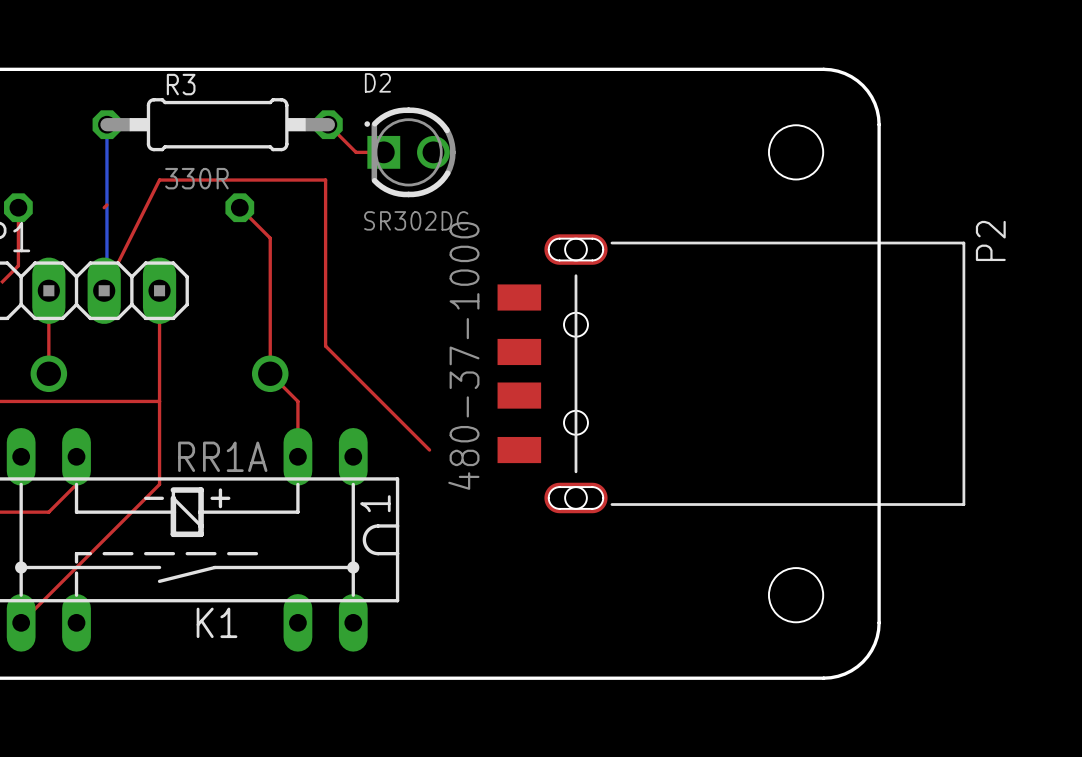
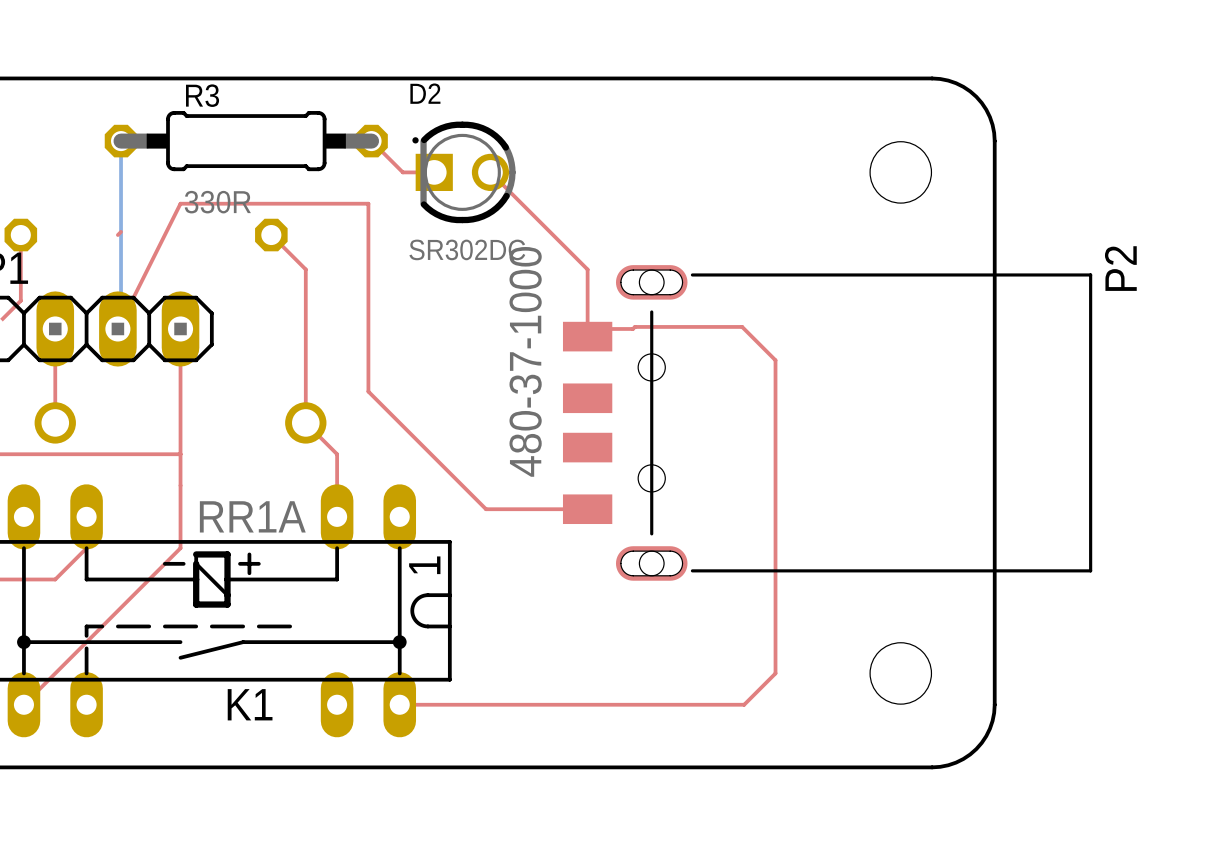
top track: none -> (490, 172) (587, 269) (587, 336)
top track: none -> (587, 328) (742, 326) (775, 360) (775, 673) (744, 704) (399, 704)
top track: none -> (486, 509) (587, 509)

